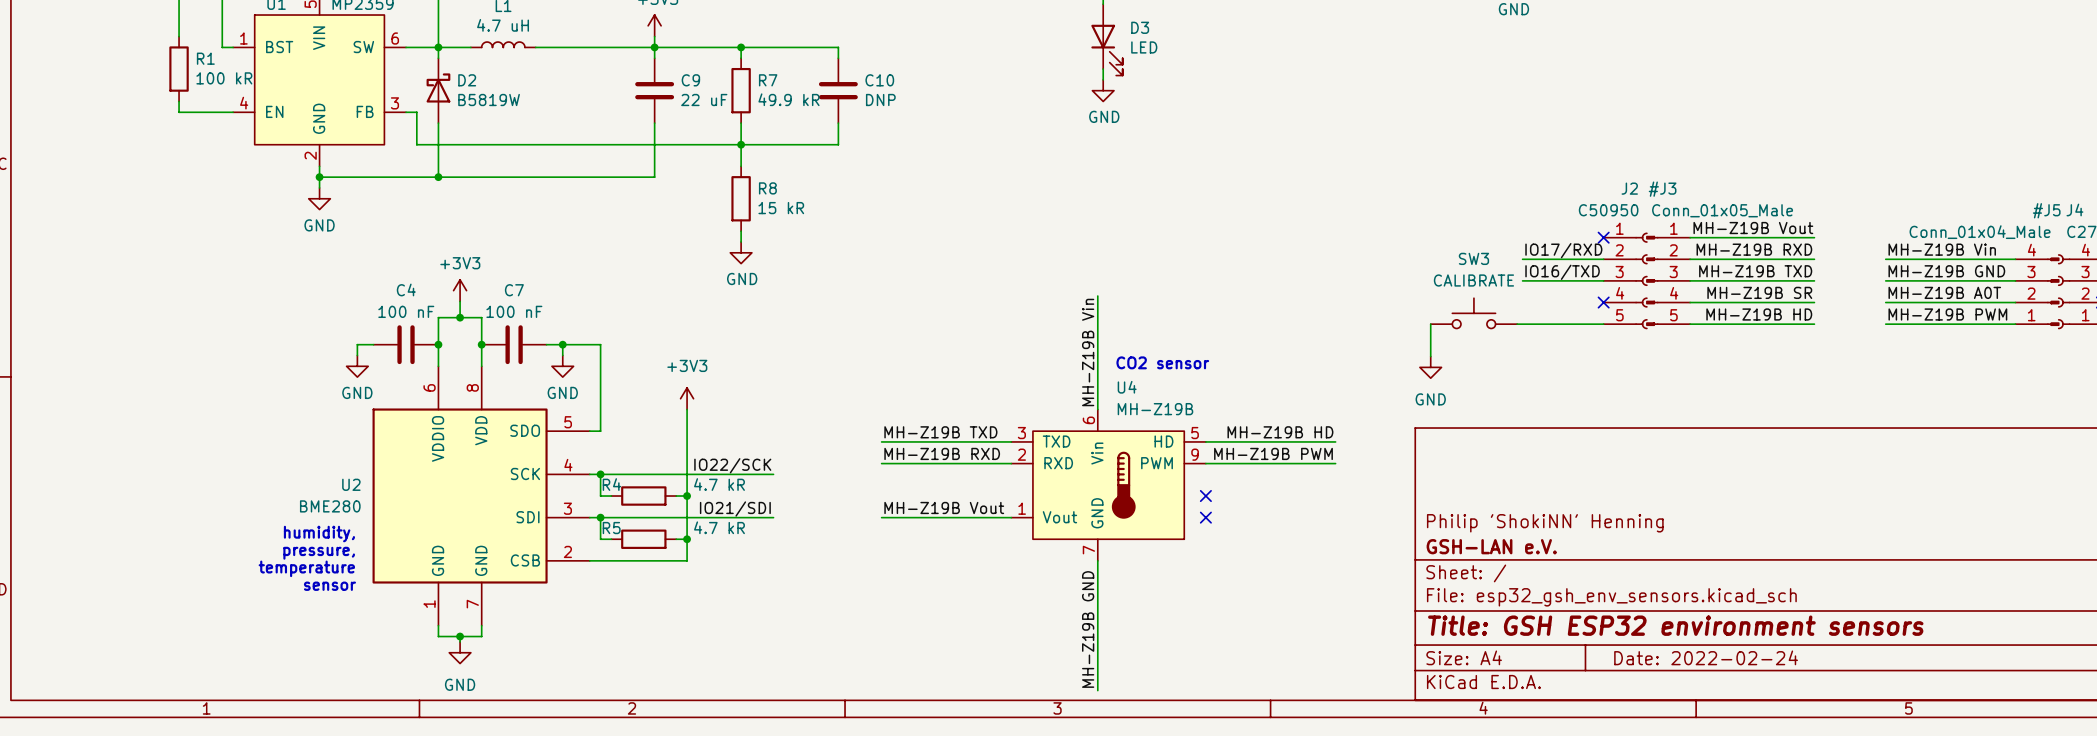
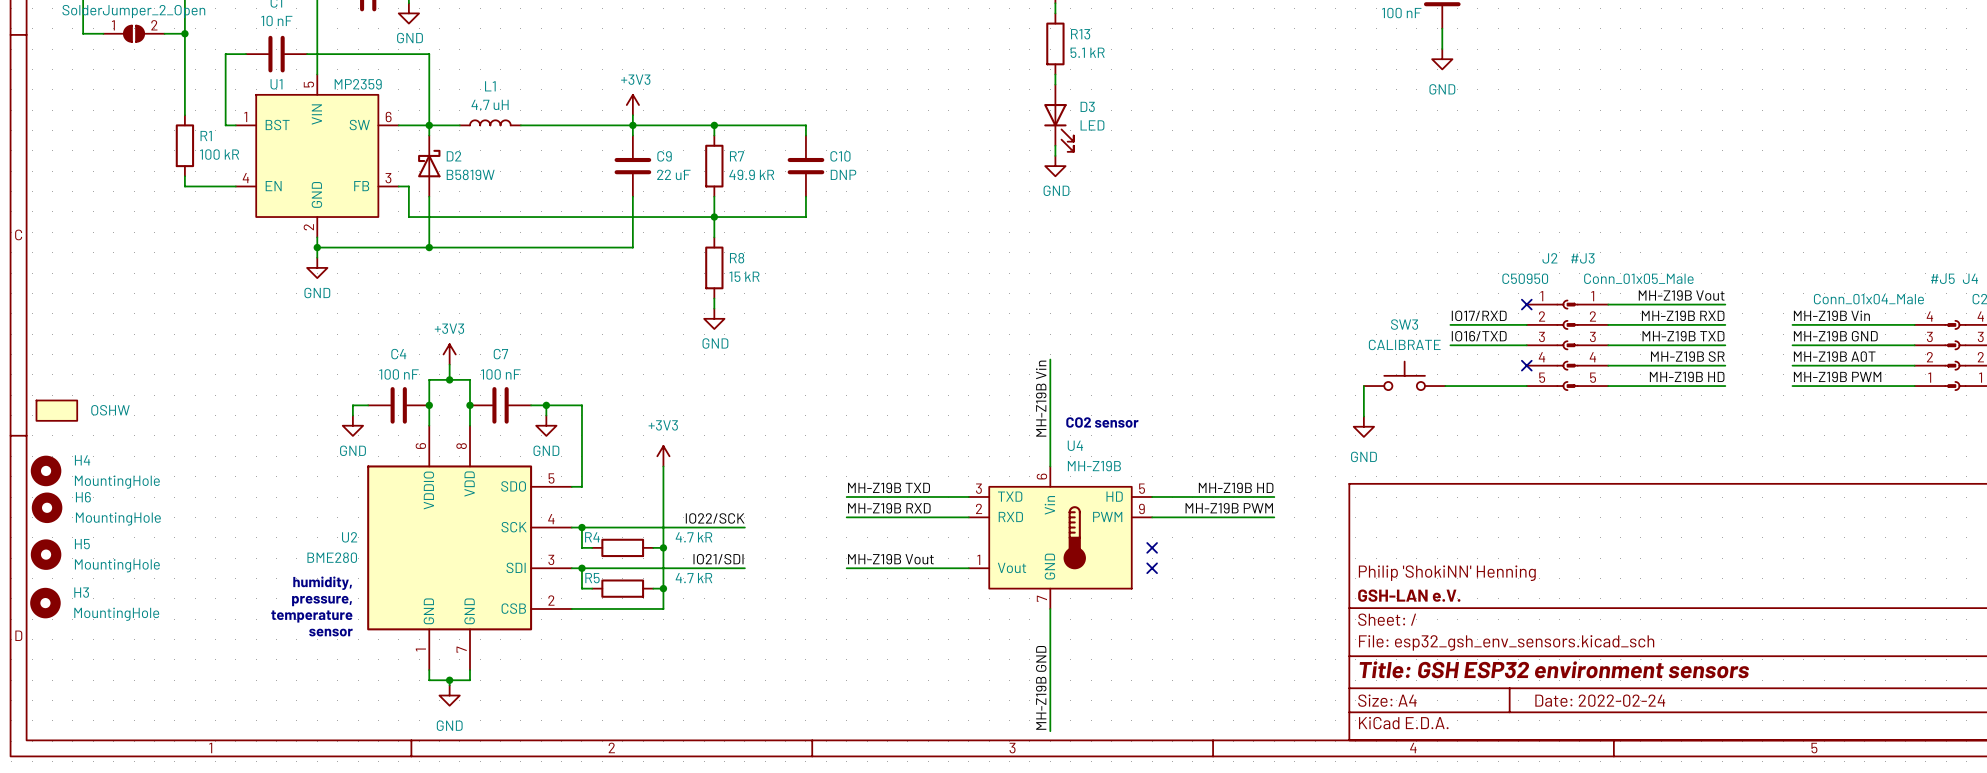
part: none -> OSHW (56, 410)
H4: none -> MountingHole (46, 470)
H6: none -> MountingHole (47, 507)
H5: none -> MountingHole (46, 554)
H3: none -> MountingHole (45, 603)

